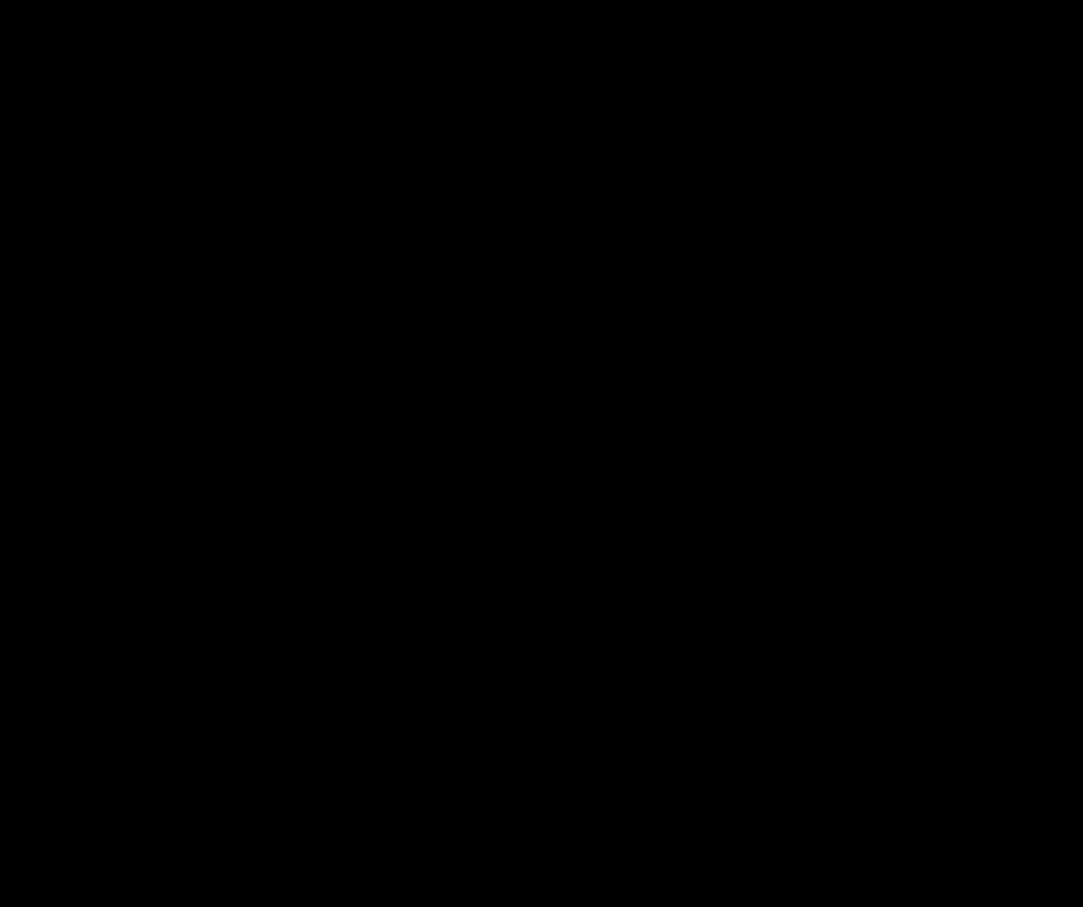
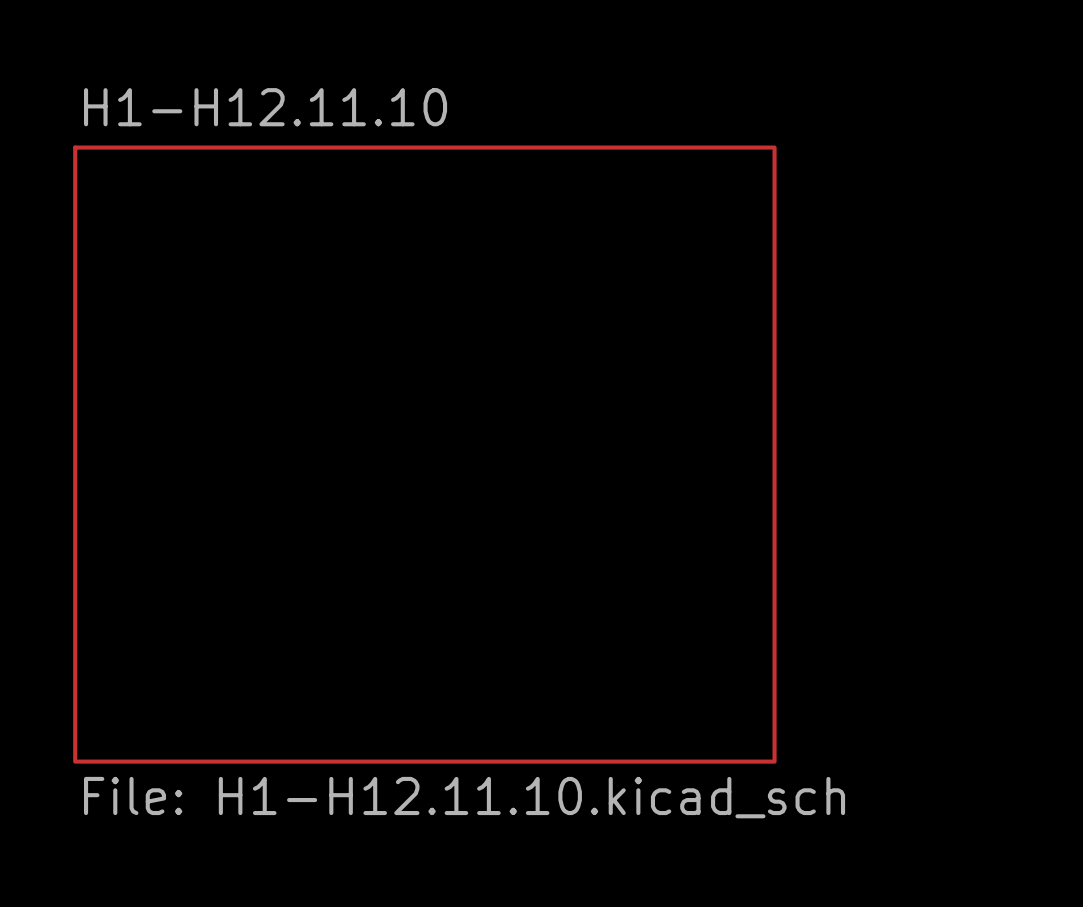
sheet H1-H12.11.10: none -> File: H1-H12.11.10.kicad_sch (424, 454)

